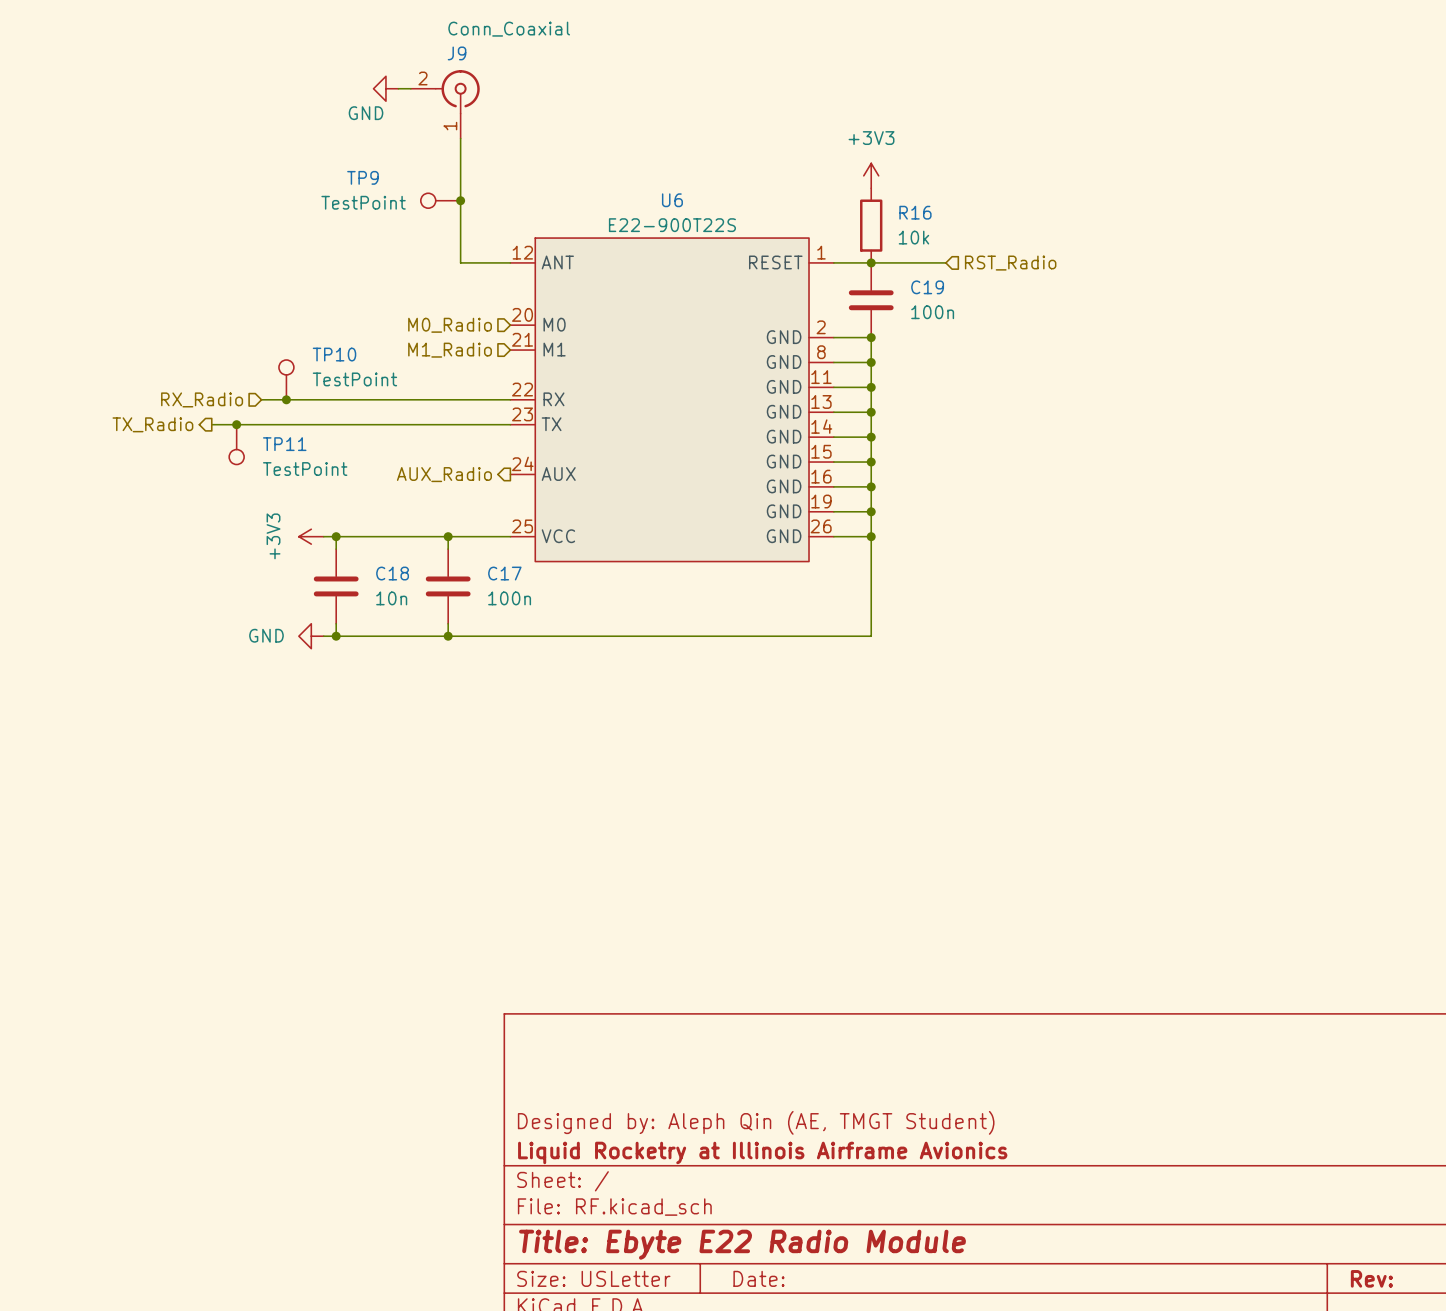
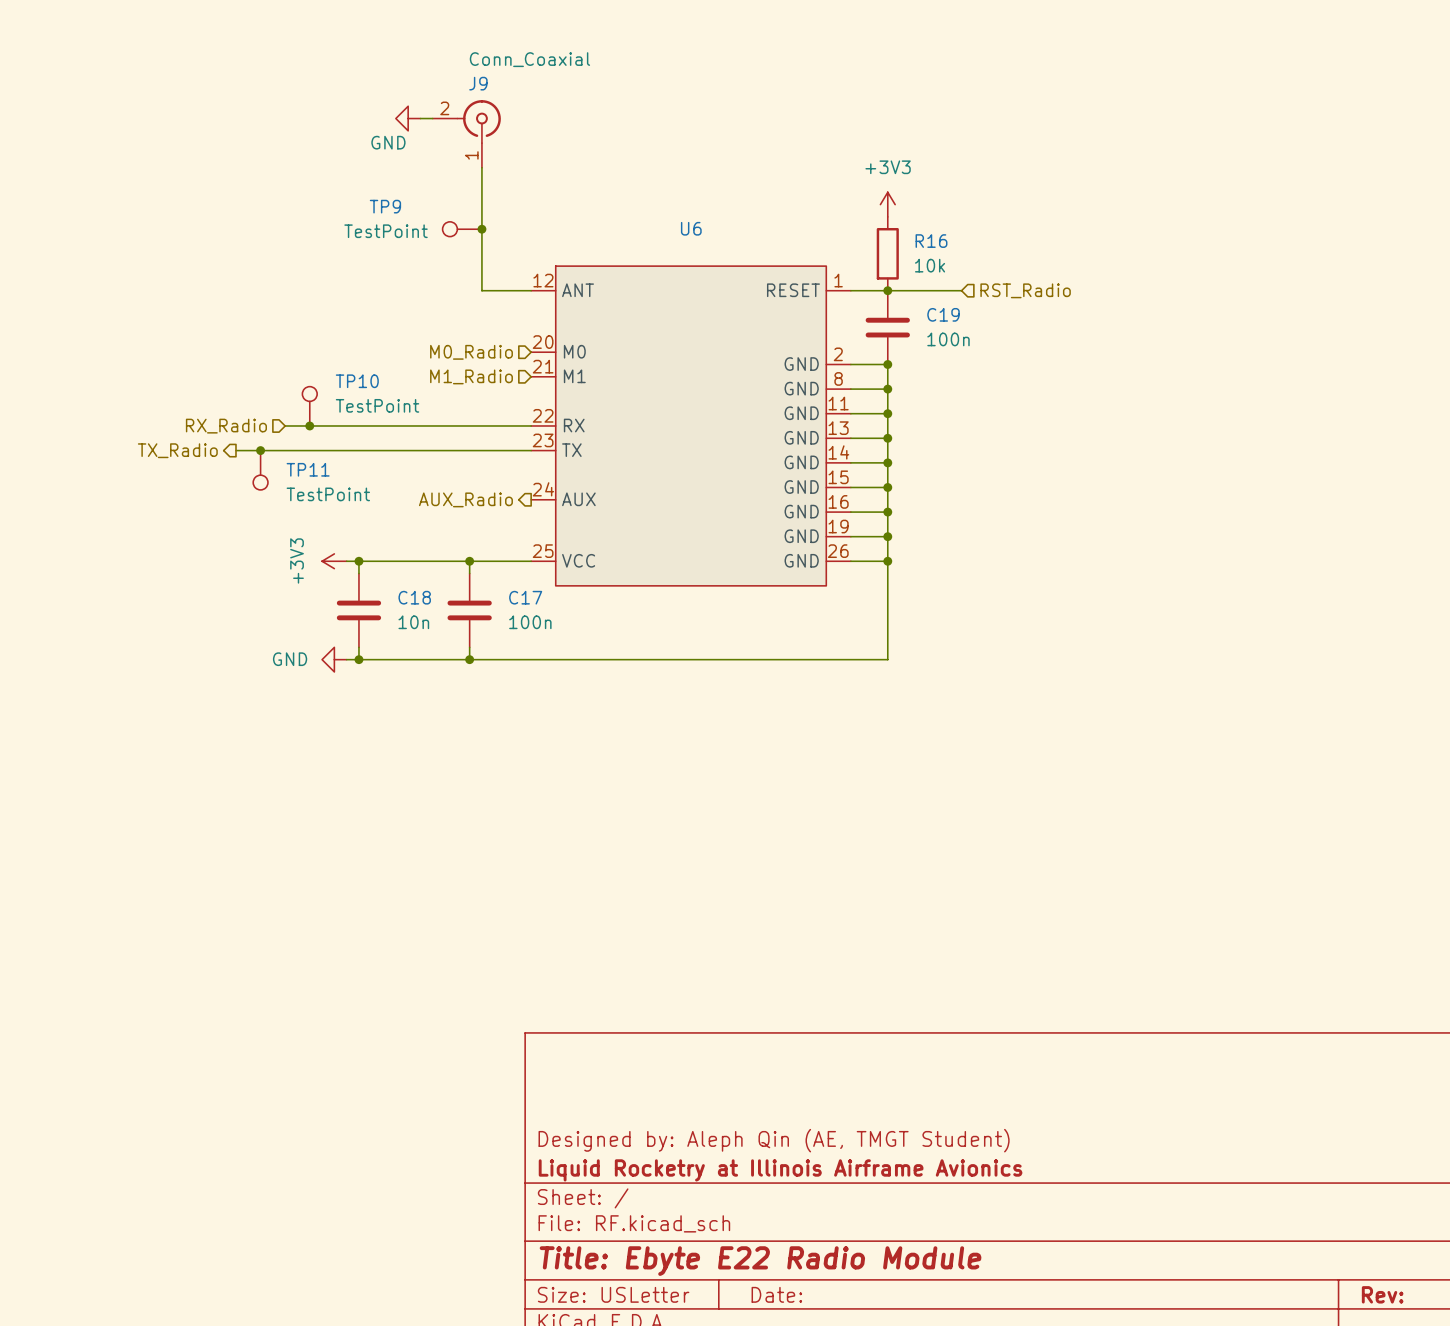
U6 value: E22-900T22S (672, 225) -> none

